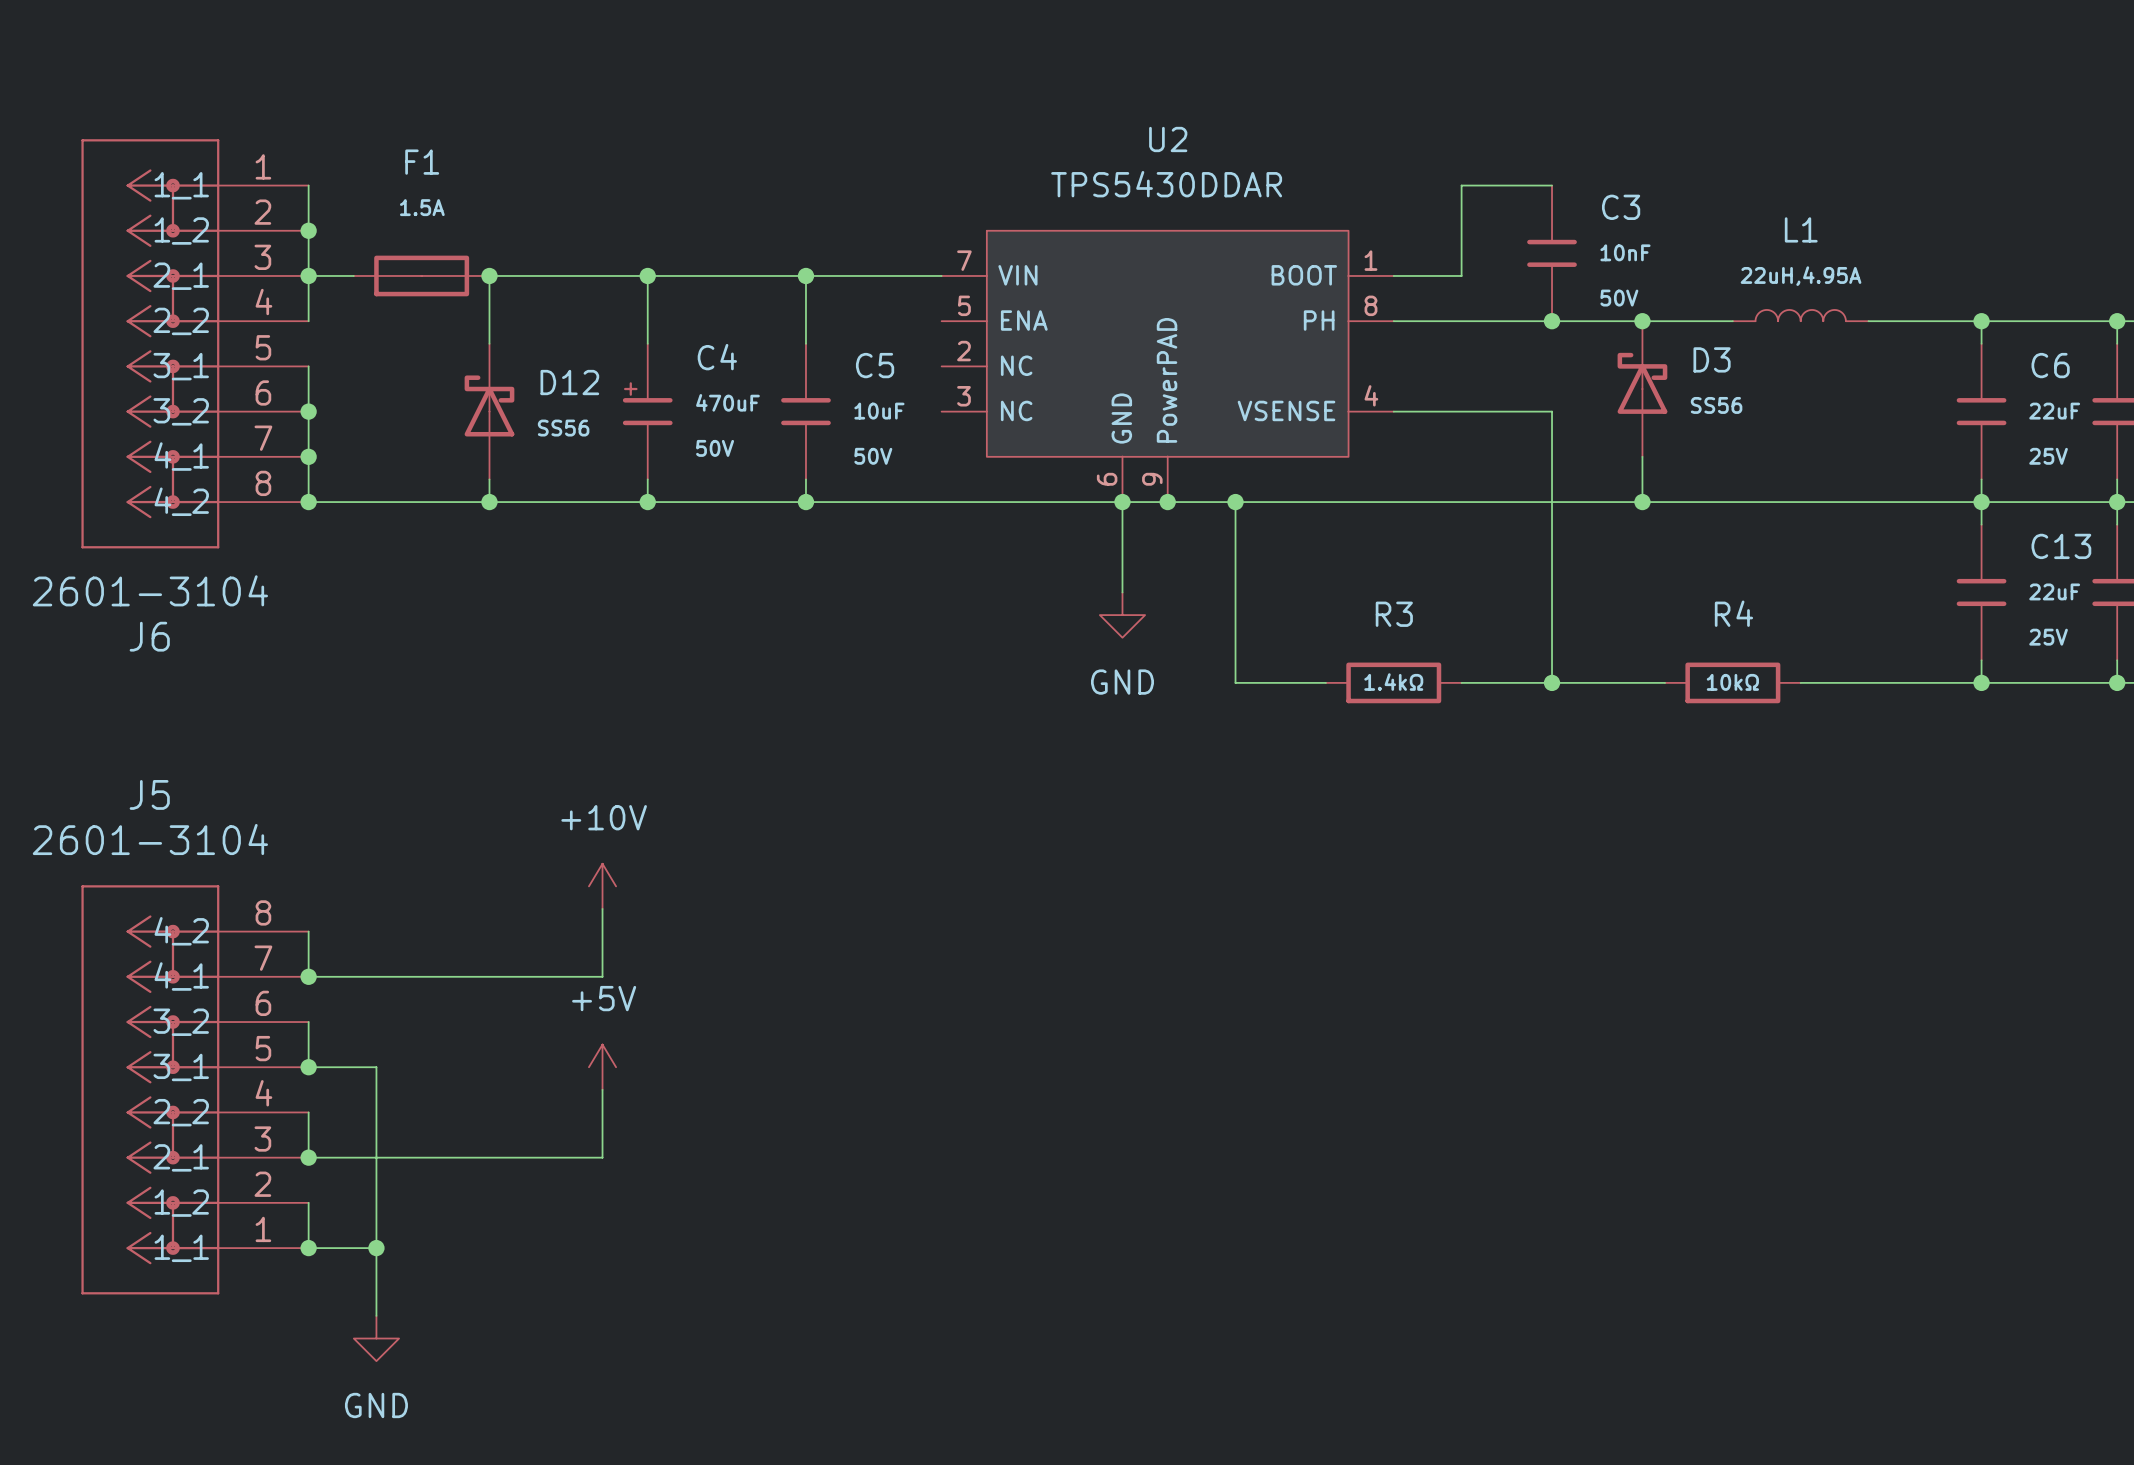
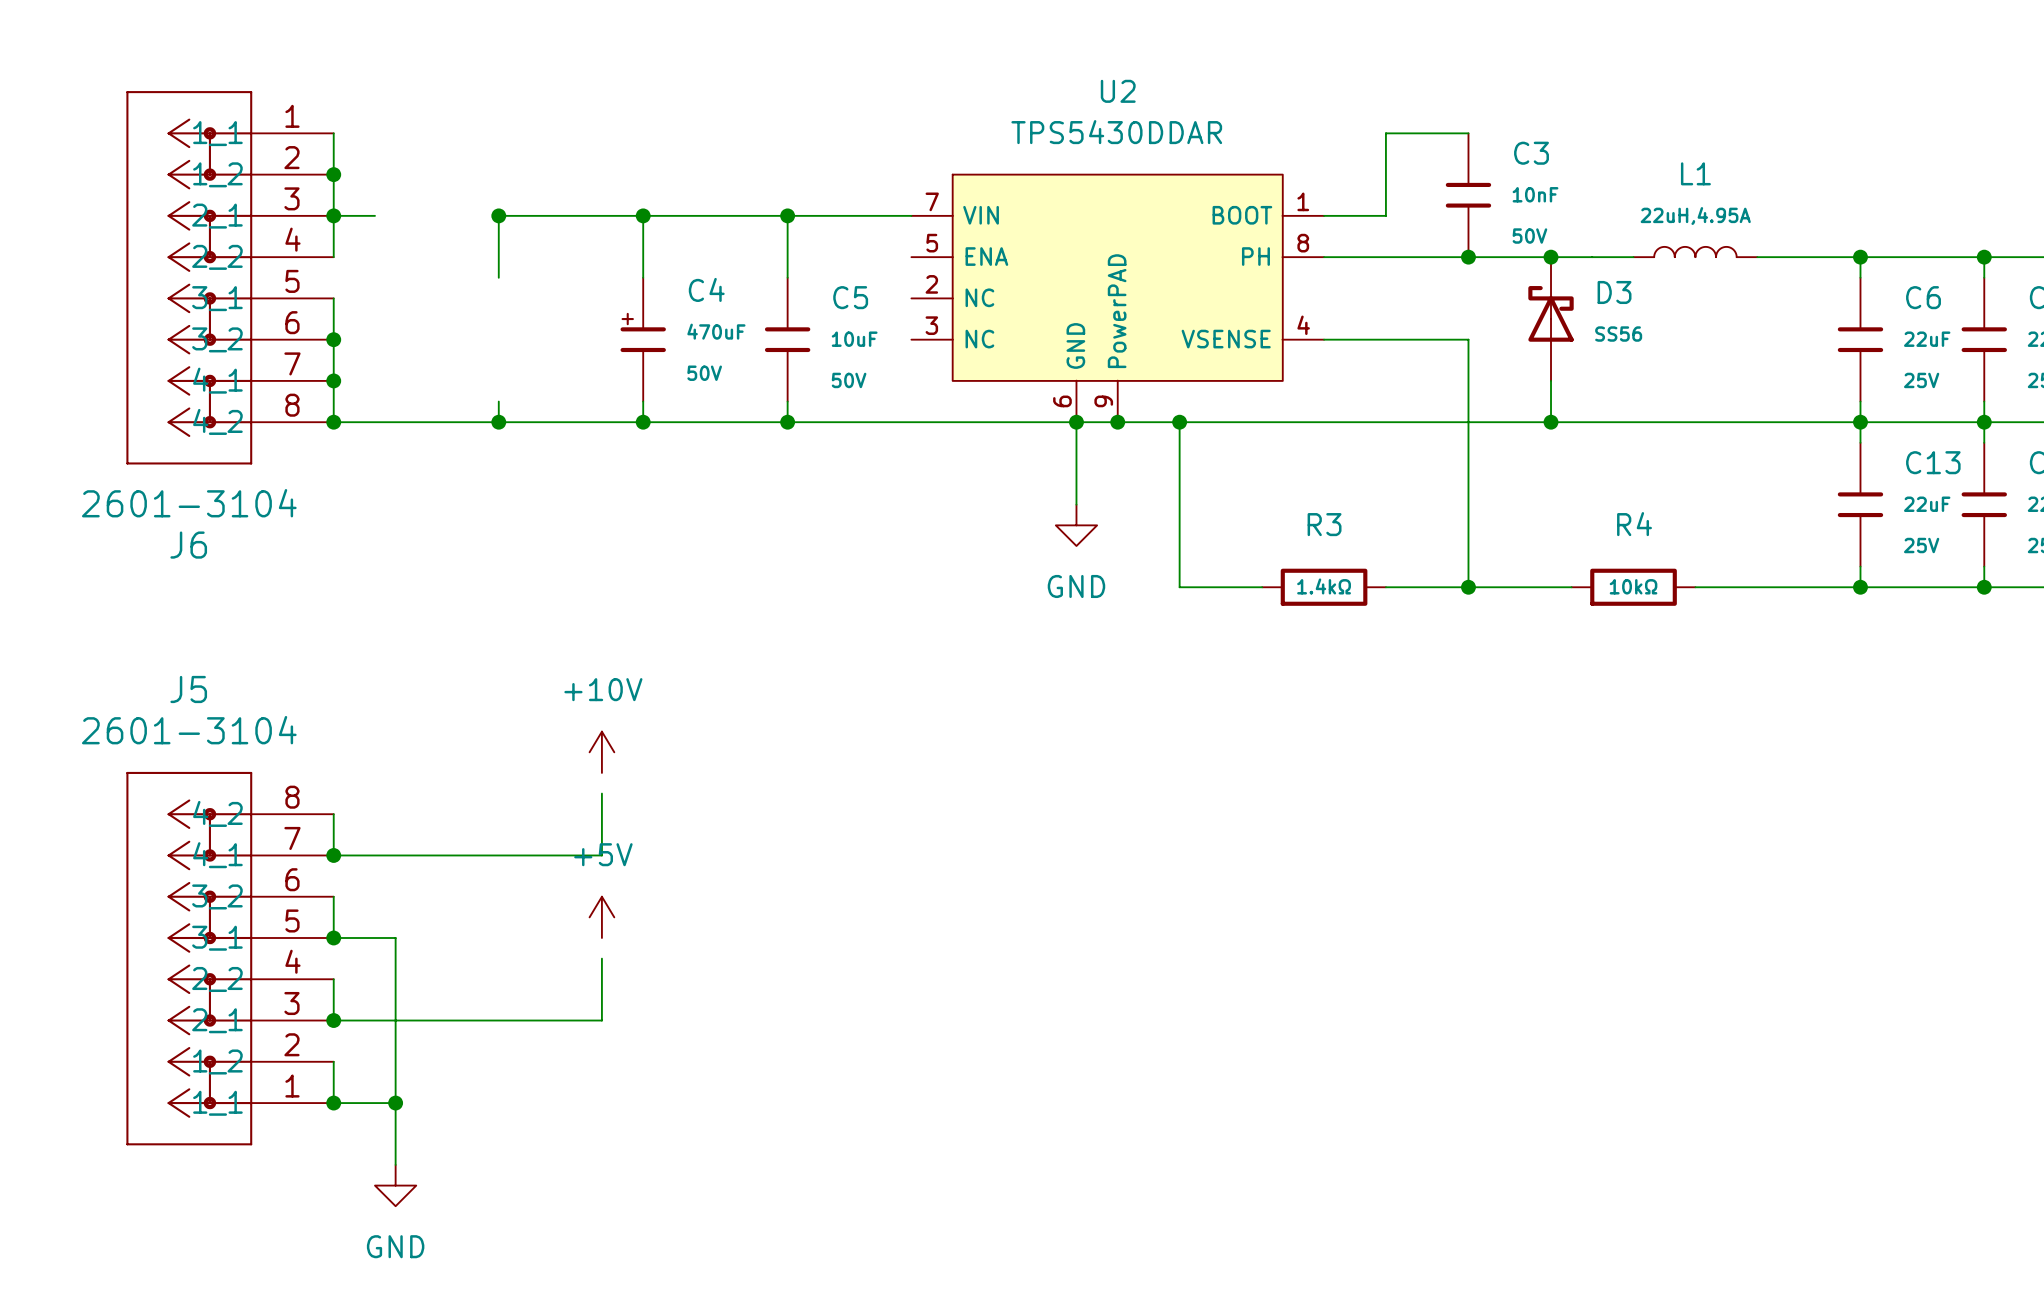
F1: 1.5A (421, 275) -> none
D12: SS56 (489, 411) -> none
power symbol position: +10V (602, 886) -> +10V (601, 752)
power symbol position: +5V (602, 1067) -> +5V (601, 917)

